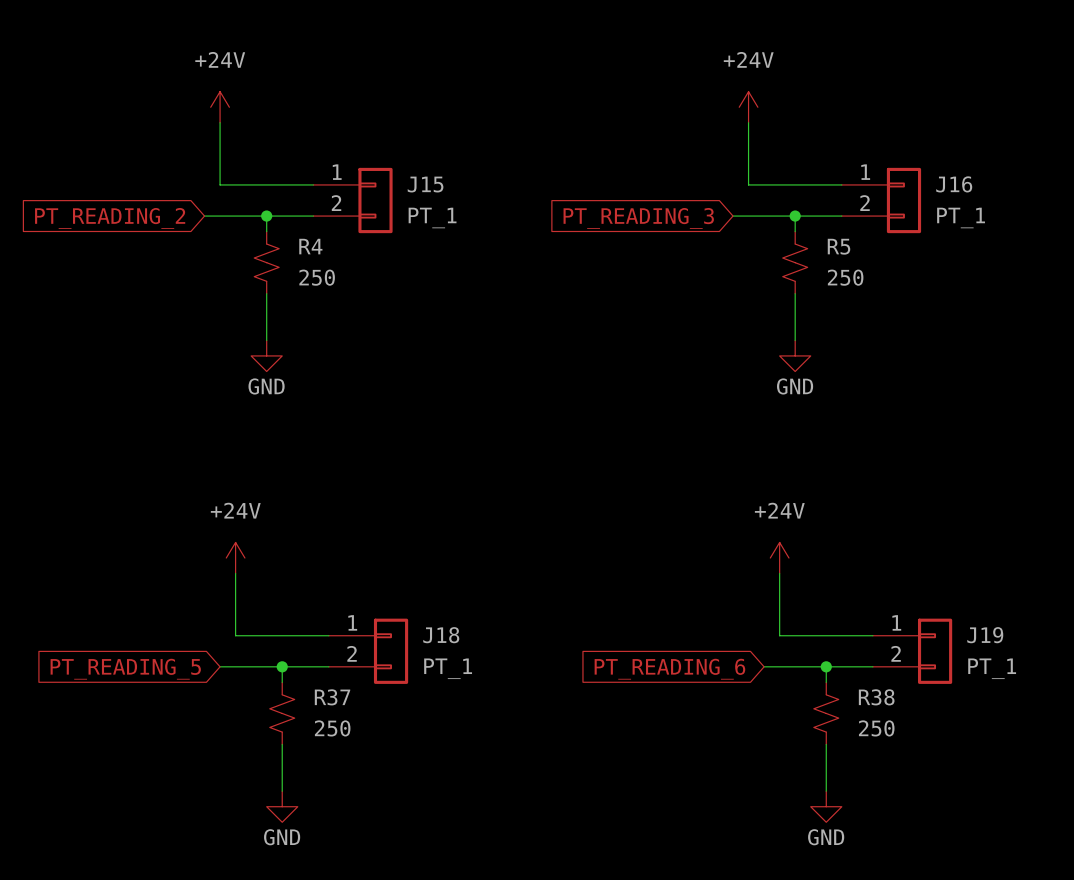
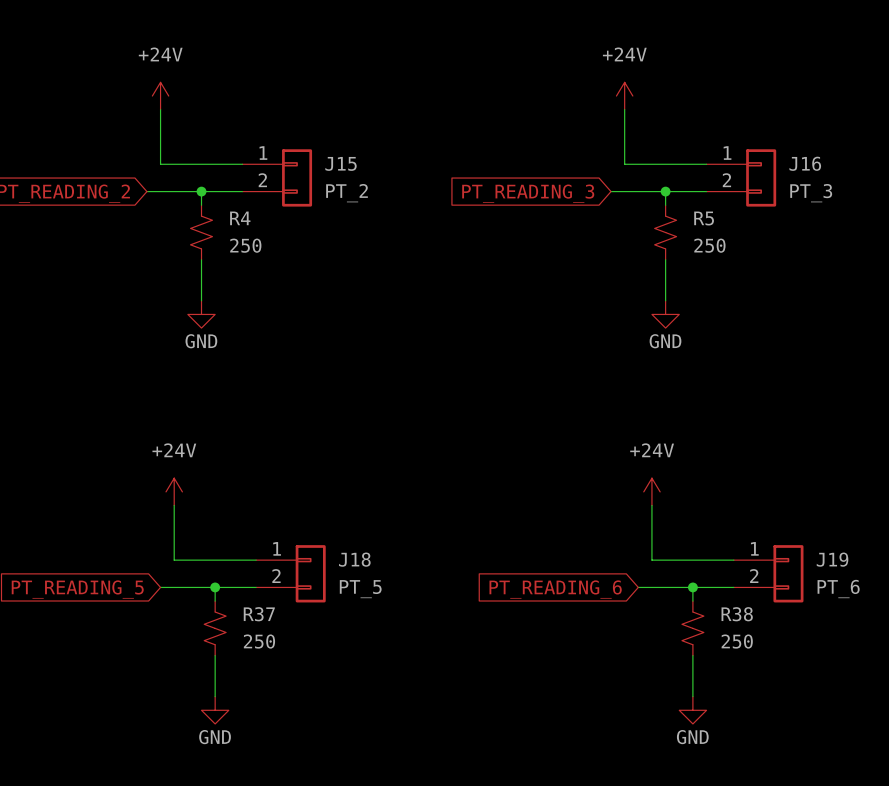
J15 value: PT_1 (432, 217) -> PT_2 (347, 193)
J16 value: PT_1 (961, 217) -> PT_3 (811, 193)
J18 value: PT_1 (448, 668) -> PT_5 (360, 589)
J19 value: PT_1 (992, 668) -> PT_6 (838, 589)

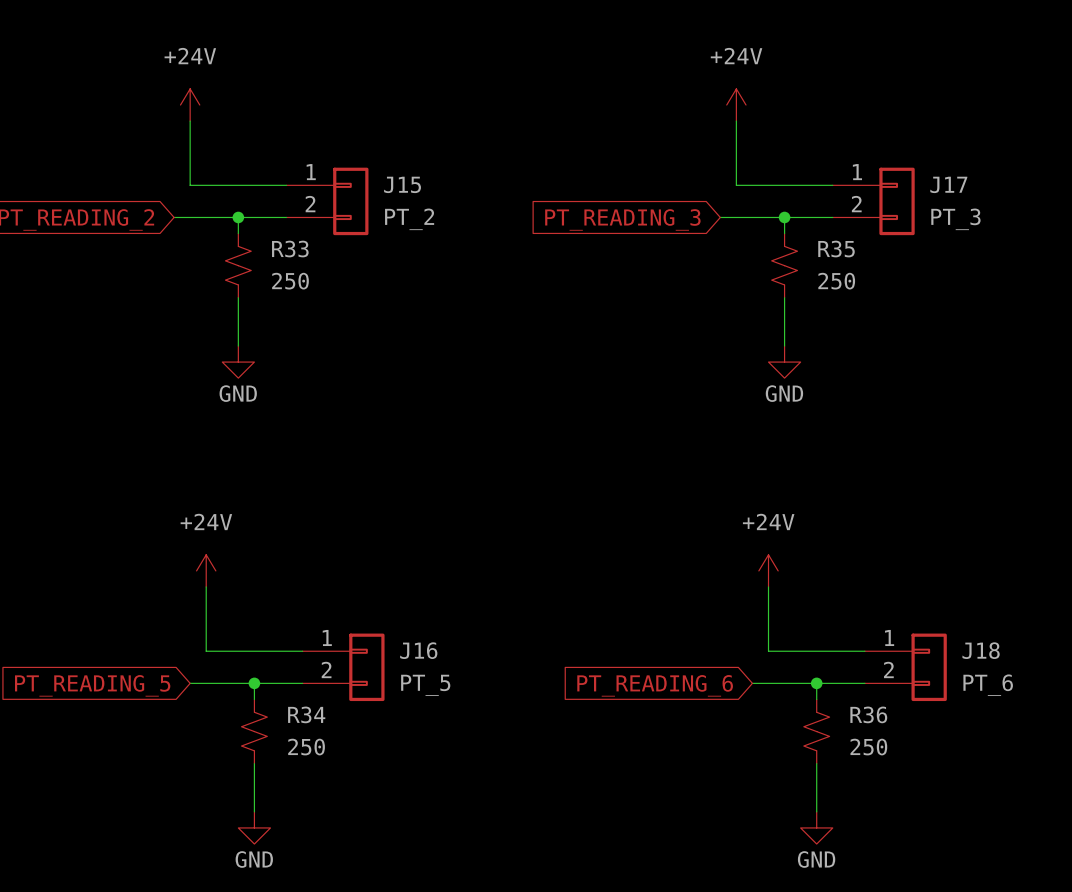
J16 name: J16 (805, 163) -> J17 (948, 184)
R4 name: R4 (240, 218) -> R33 (290, 249)
R5 name: R5 (704, 218) -> R35 (836, 249)
J18 name: J18 (354, 559) -> J16 (418, 650)
J19 name: J19 (832, 559) -> J18 (981, 650)
R37 name: R37 (259, 614) -> R34 (306, 714)
R38 name: R38 (737, 614) -> R36 (868, 714)

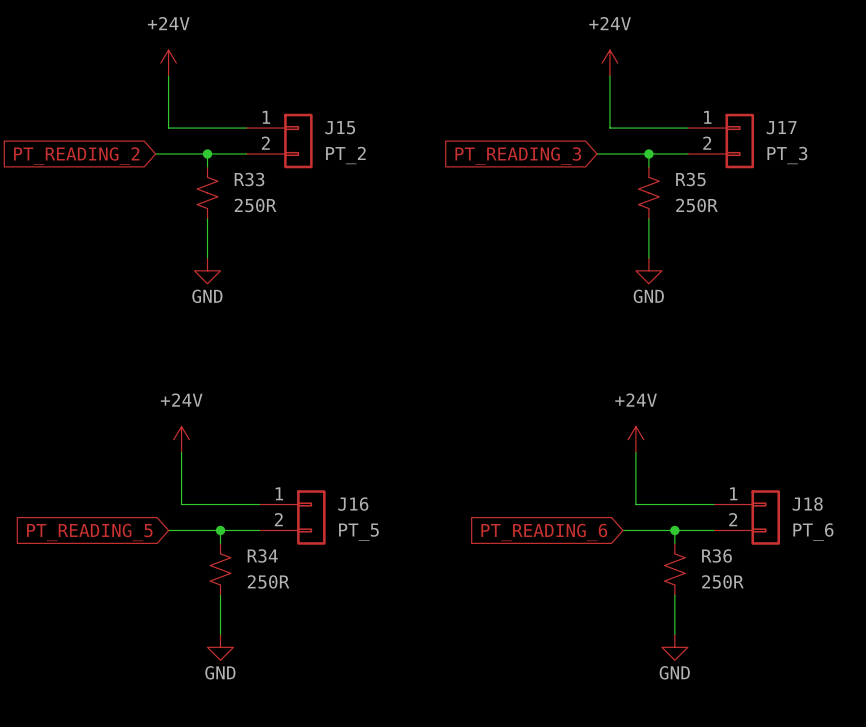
R33 value: 250 (290, 281) -> 250R (255, 205)
R35 value: 250 (836, 281) -> 250R (696, 205)
R34 value: 250 (306, 747) -> 250R (268, 581)
R36 value: 250 (868, 747) -> 250R (722, 581)

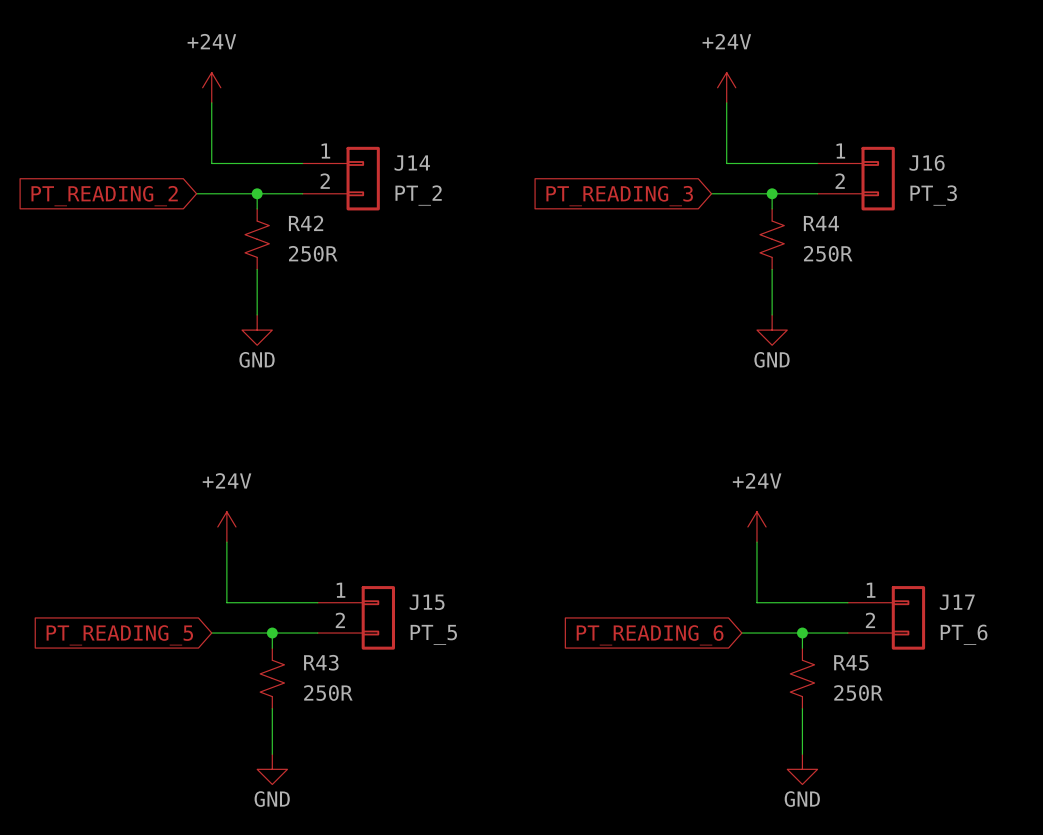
J15 name: J15 (340, 127) -> J14 (412, 163)
J17 name: J17 (781, 127) -> J16 (927, 162)
R33 name: R33 (249, 179) -> R42 (306, 223)
R35 name: R35 (690, 179) -> R44 (821, 223)
J16 name: J16 (353, 504) -> J15 (427, 602)
J18 name: J18 (807, 504) -> J17 (957, 602)
R34 name: R34 (262, 555) -> R43 (321, 662)
R36 name: R36 (716, 555) -> R45 (851, 662)

